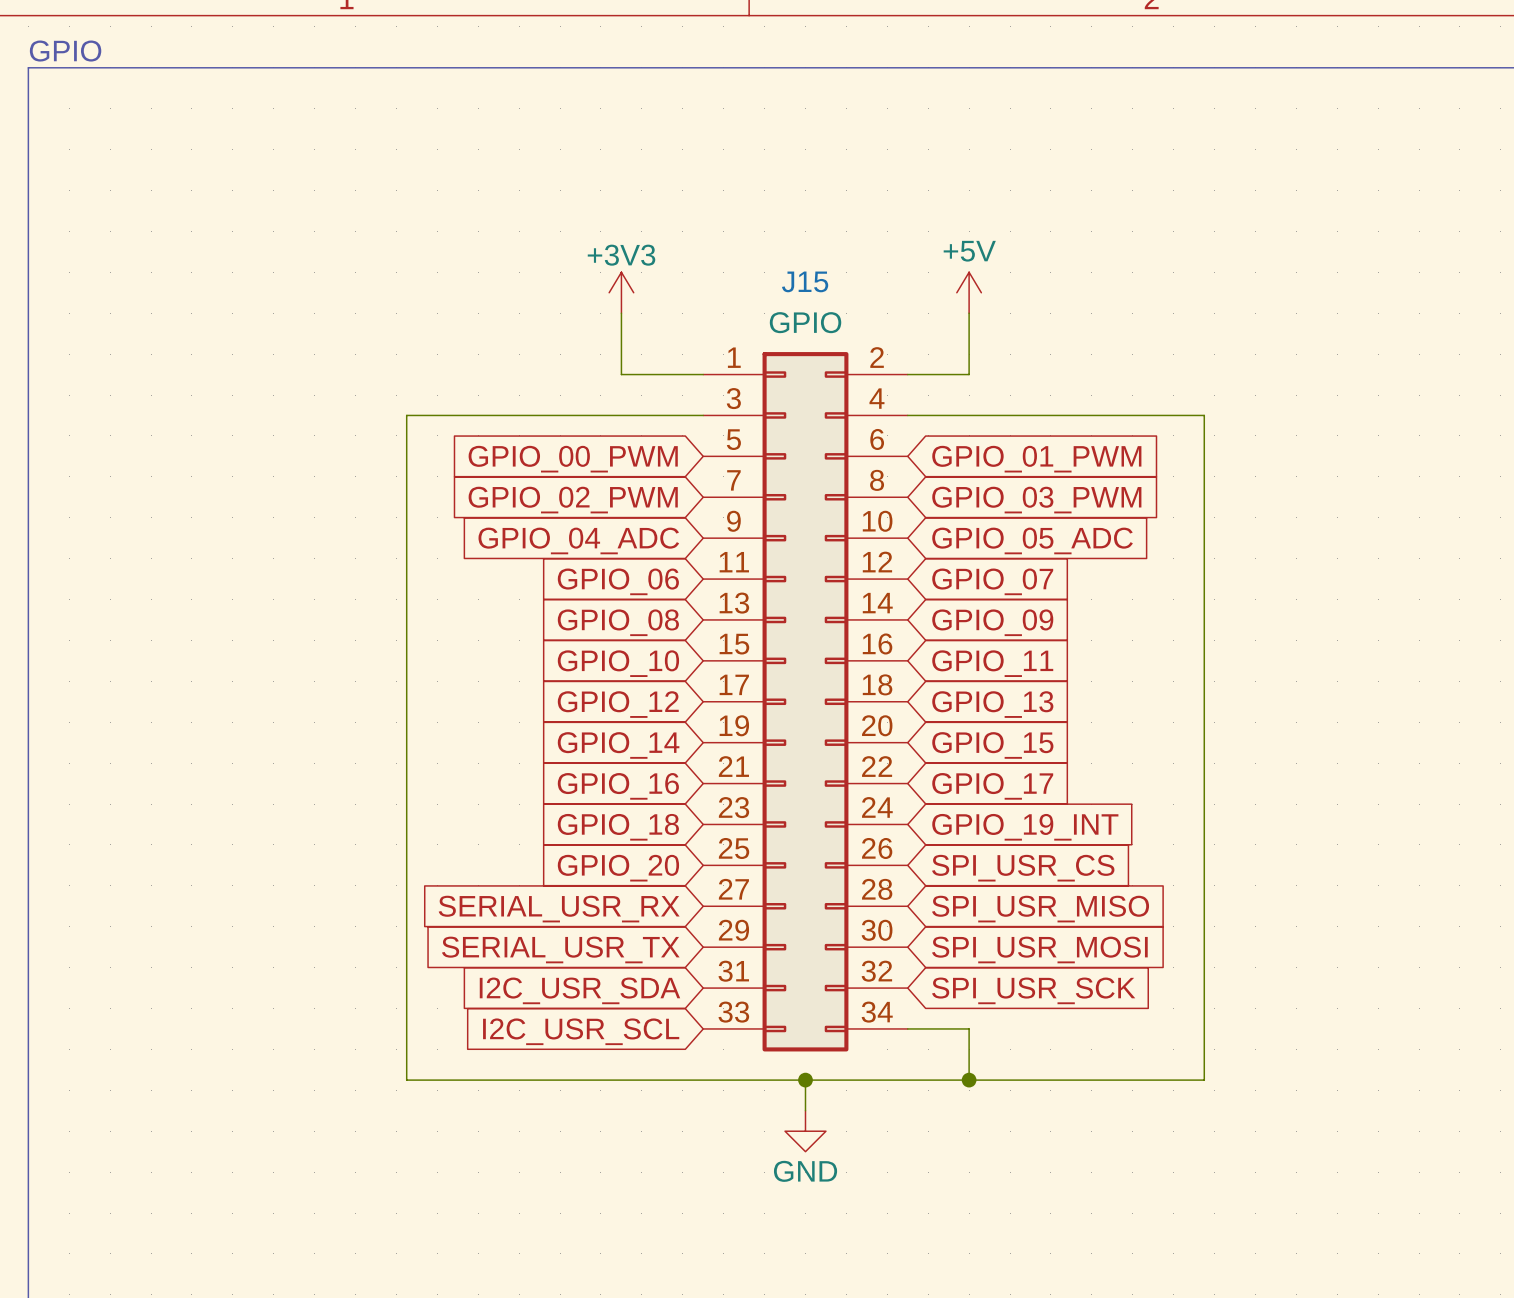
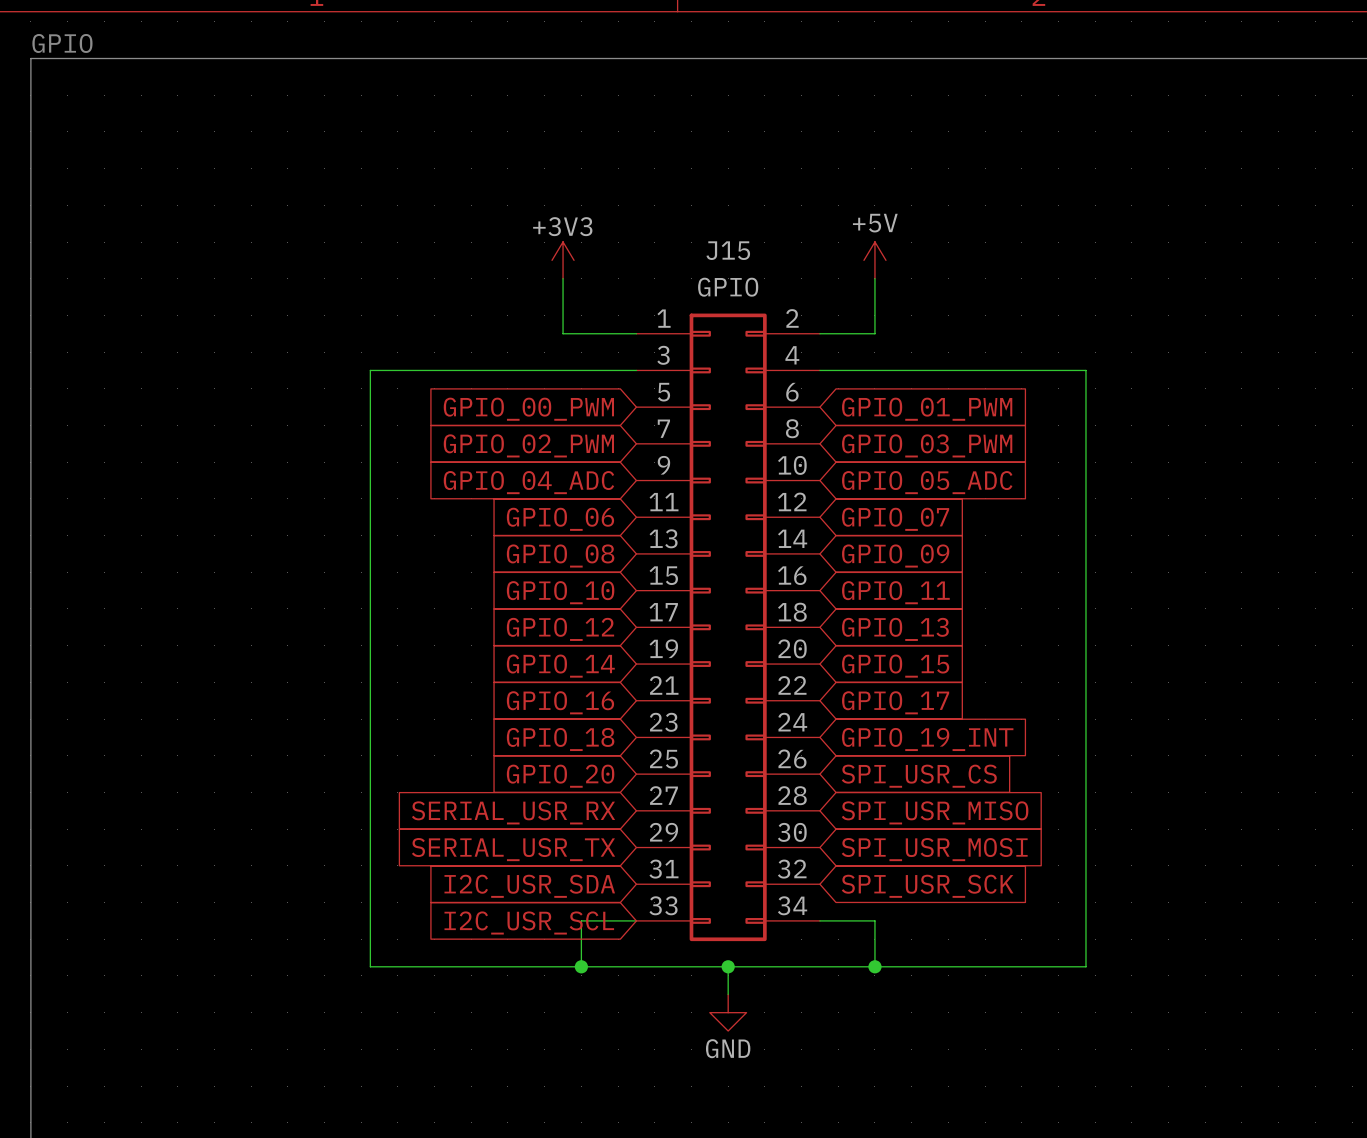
wire: none -> (636, 920) (581, 920) (581, 966)
junction: none -> (581, 966)

